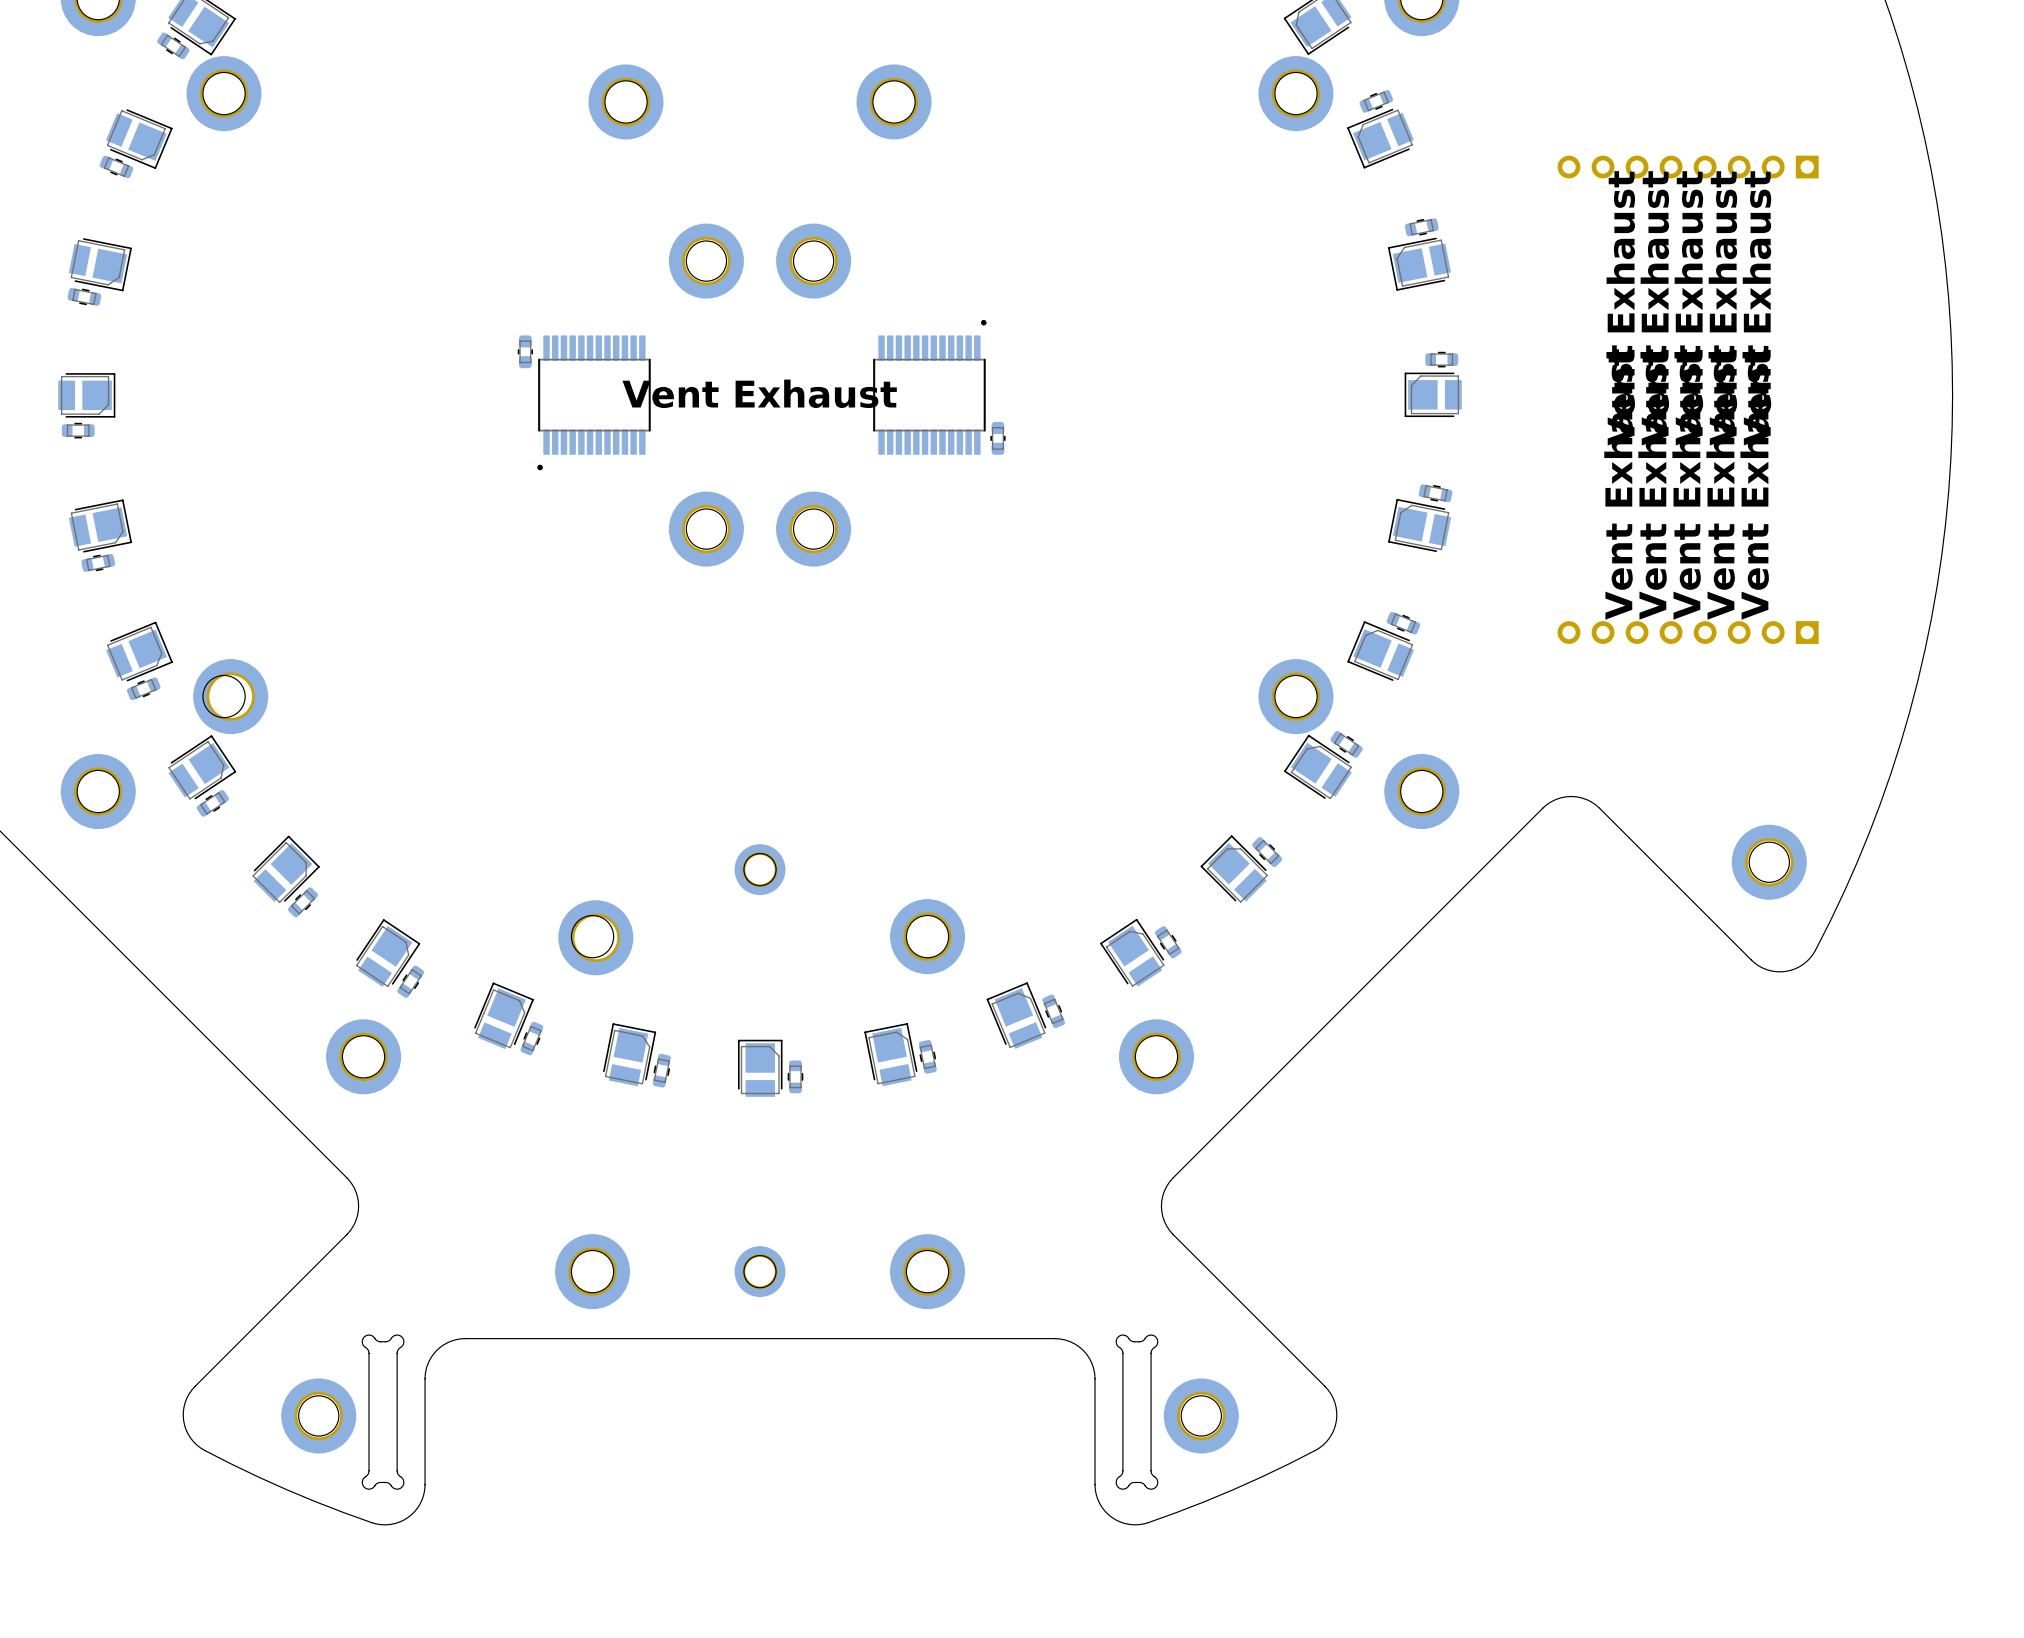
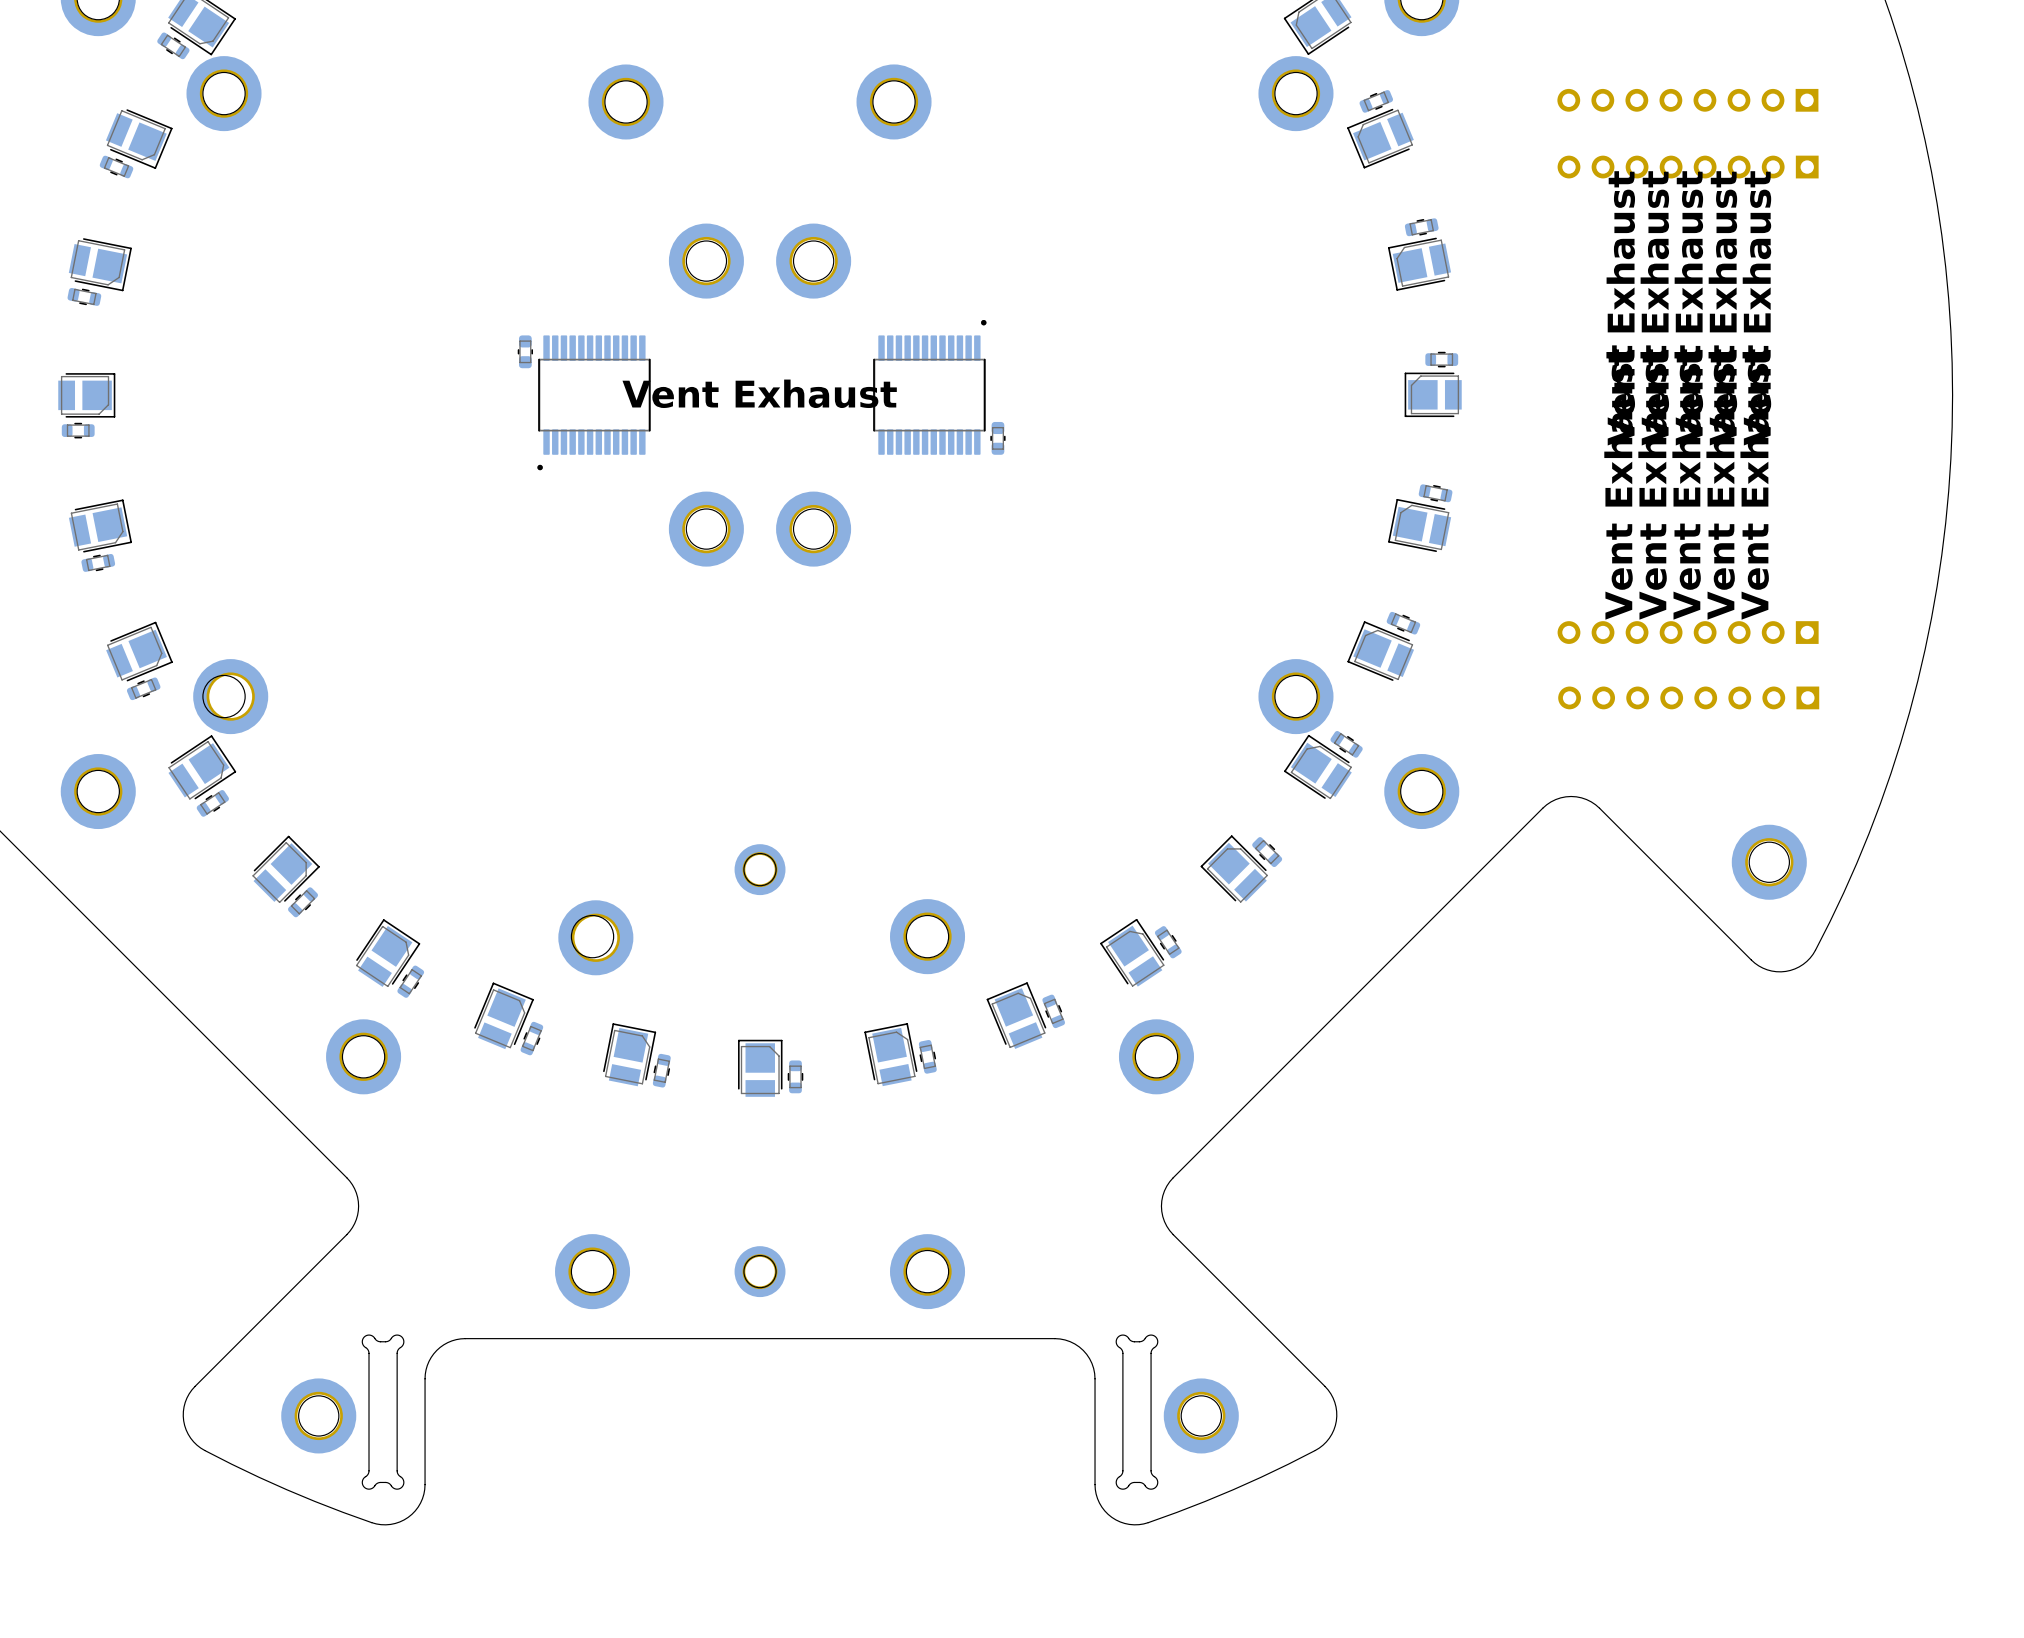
part: none -> (1687, 100)
part: none -> (1688, 697)

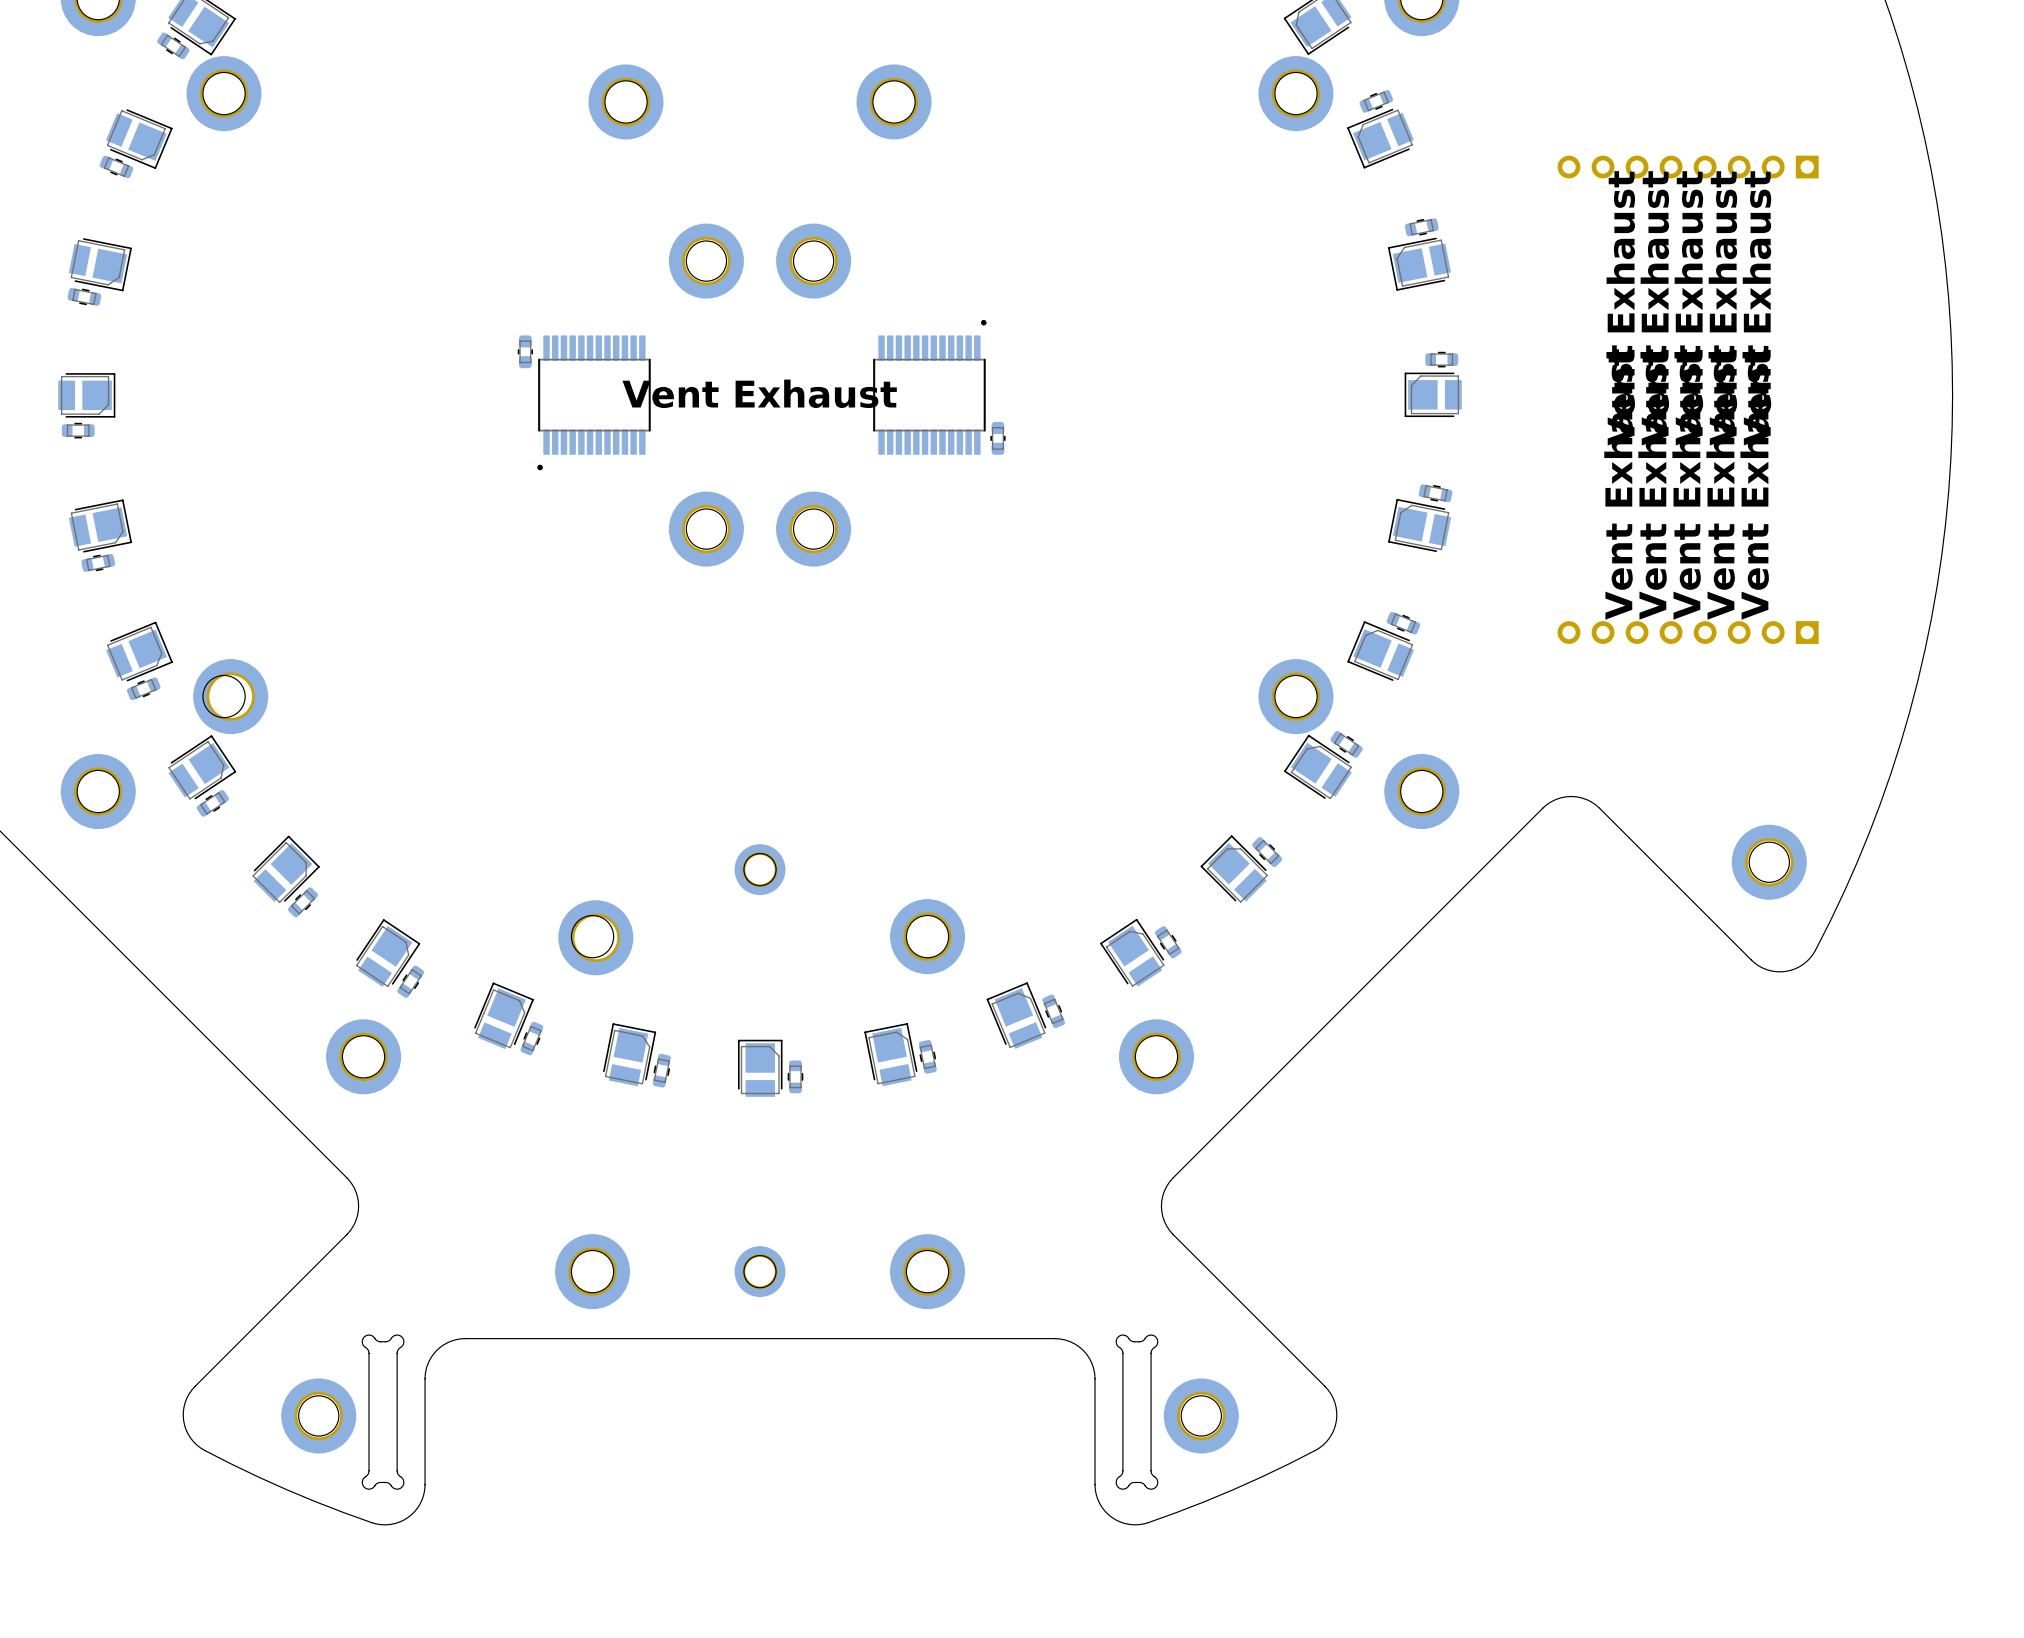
part: (1687, 100) -> none
part: (1688, 697) -> none

